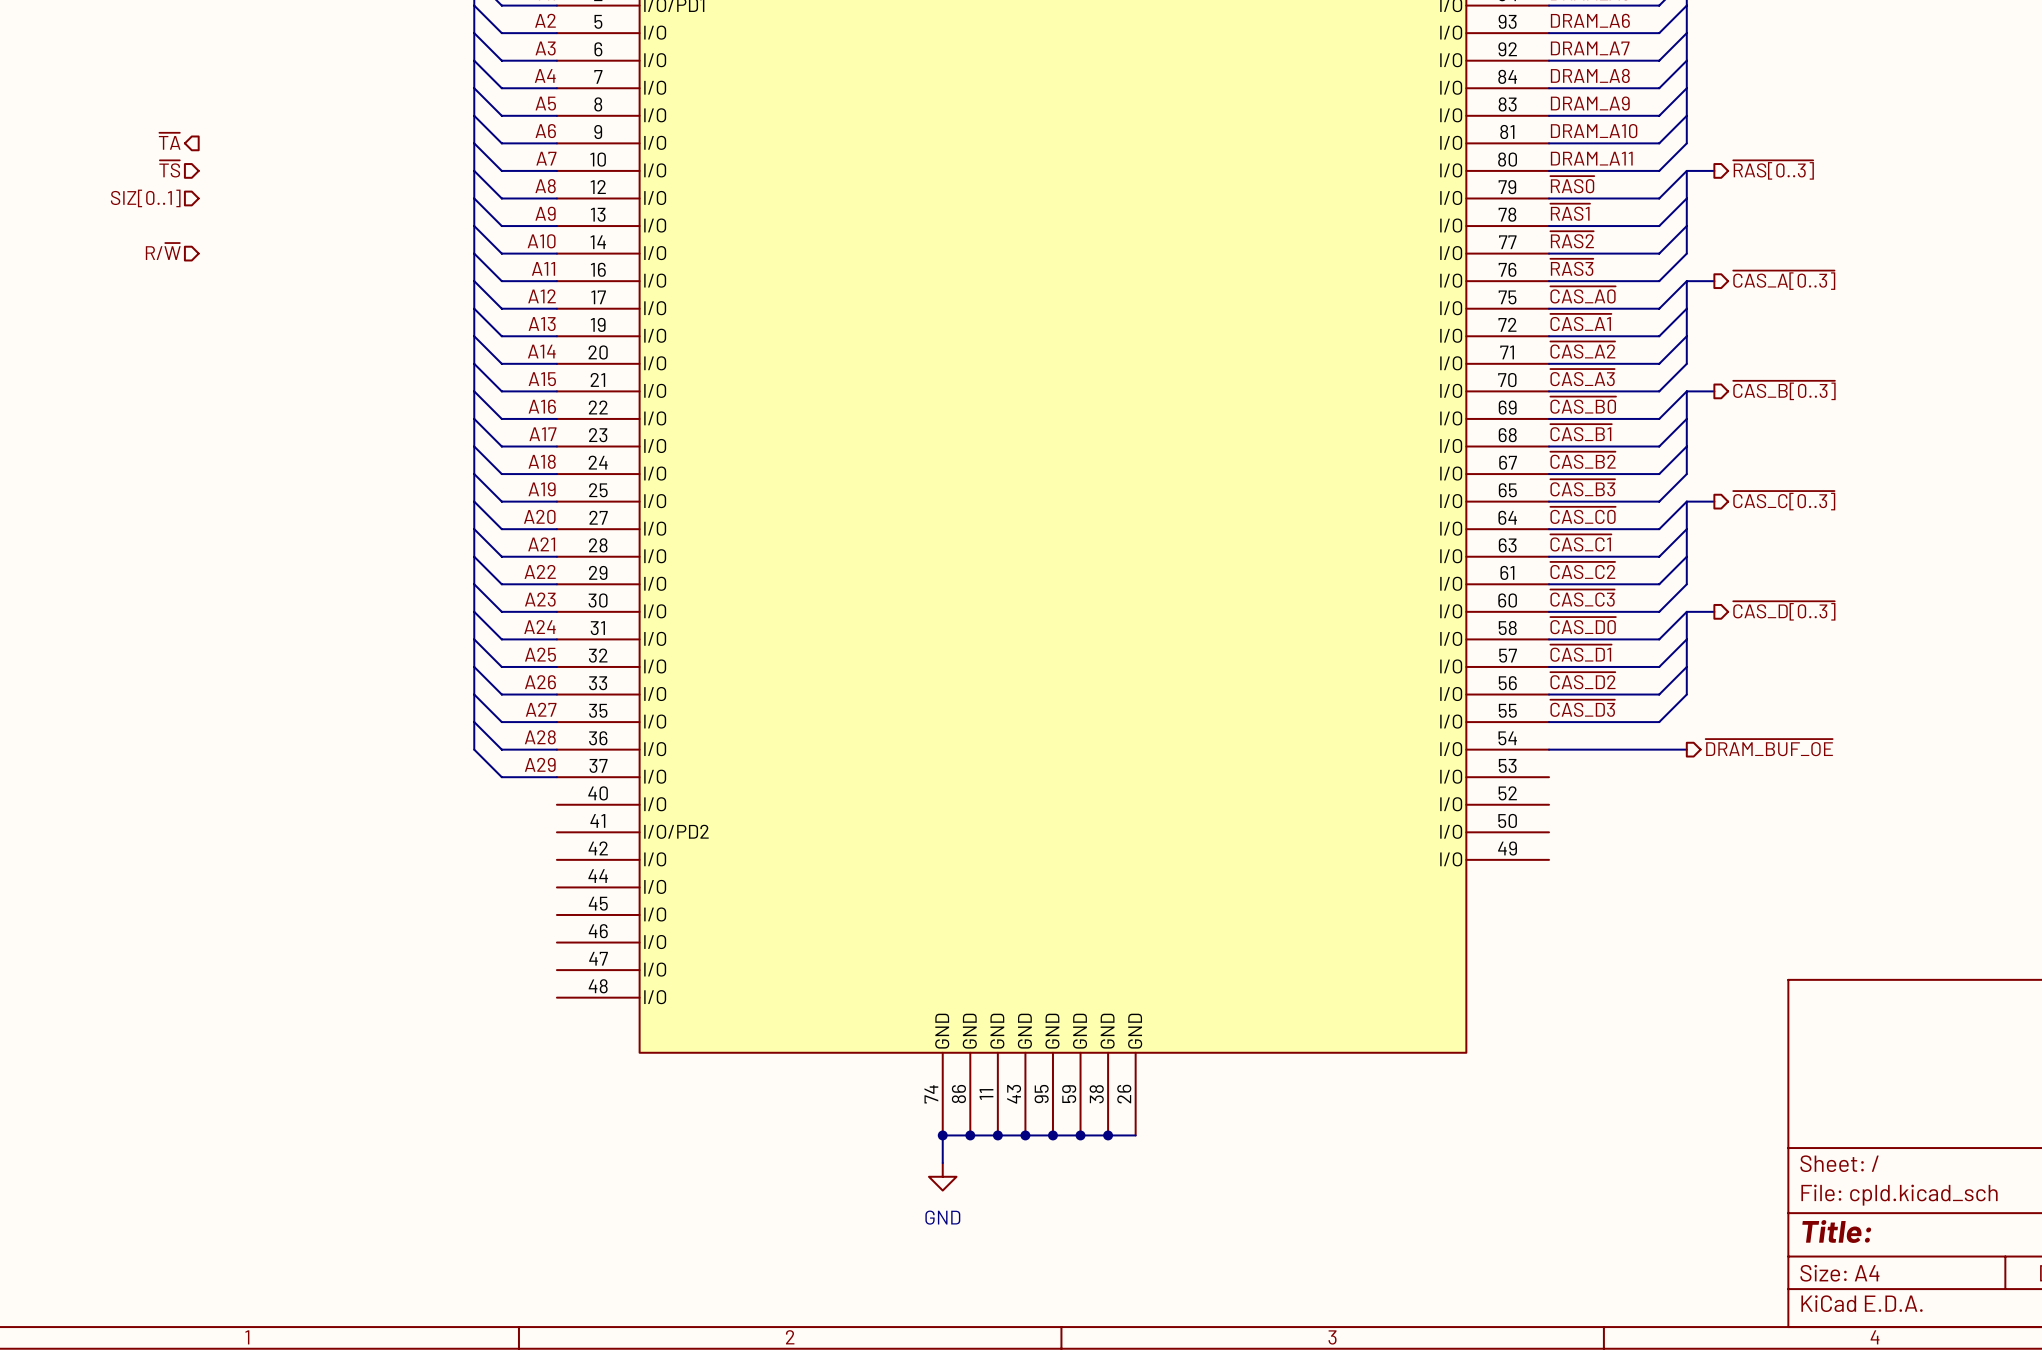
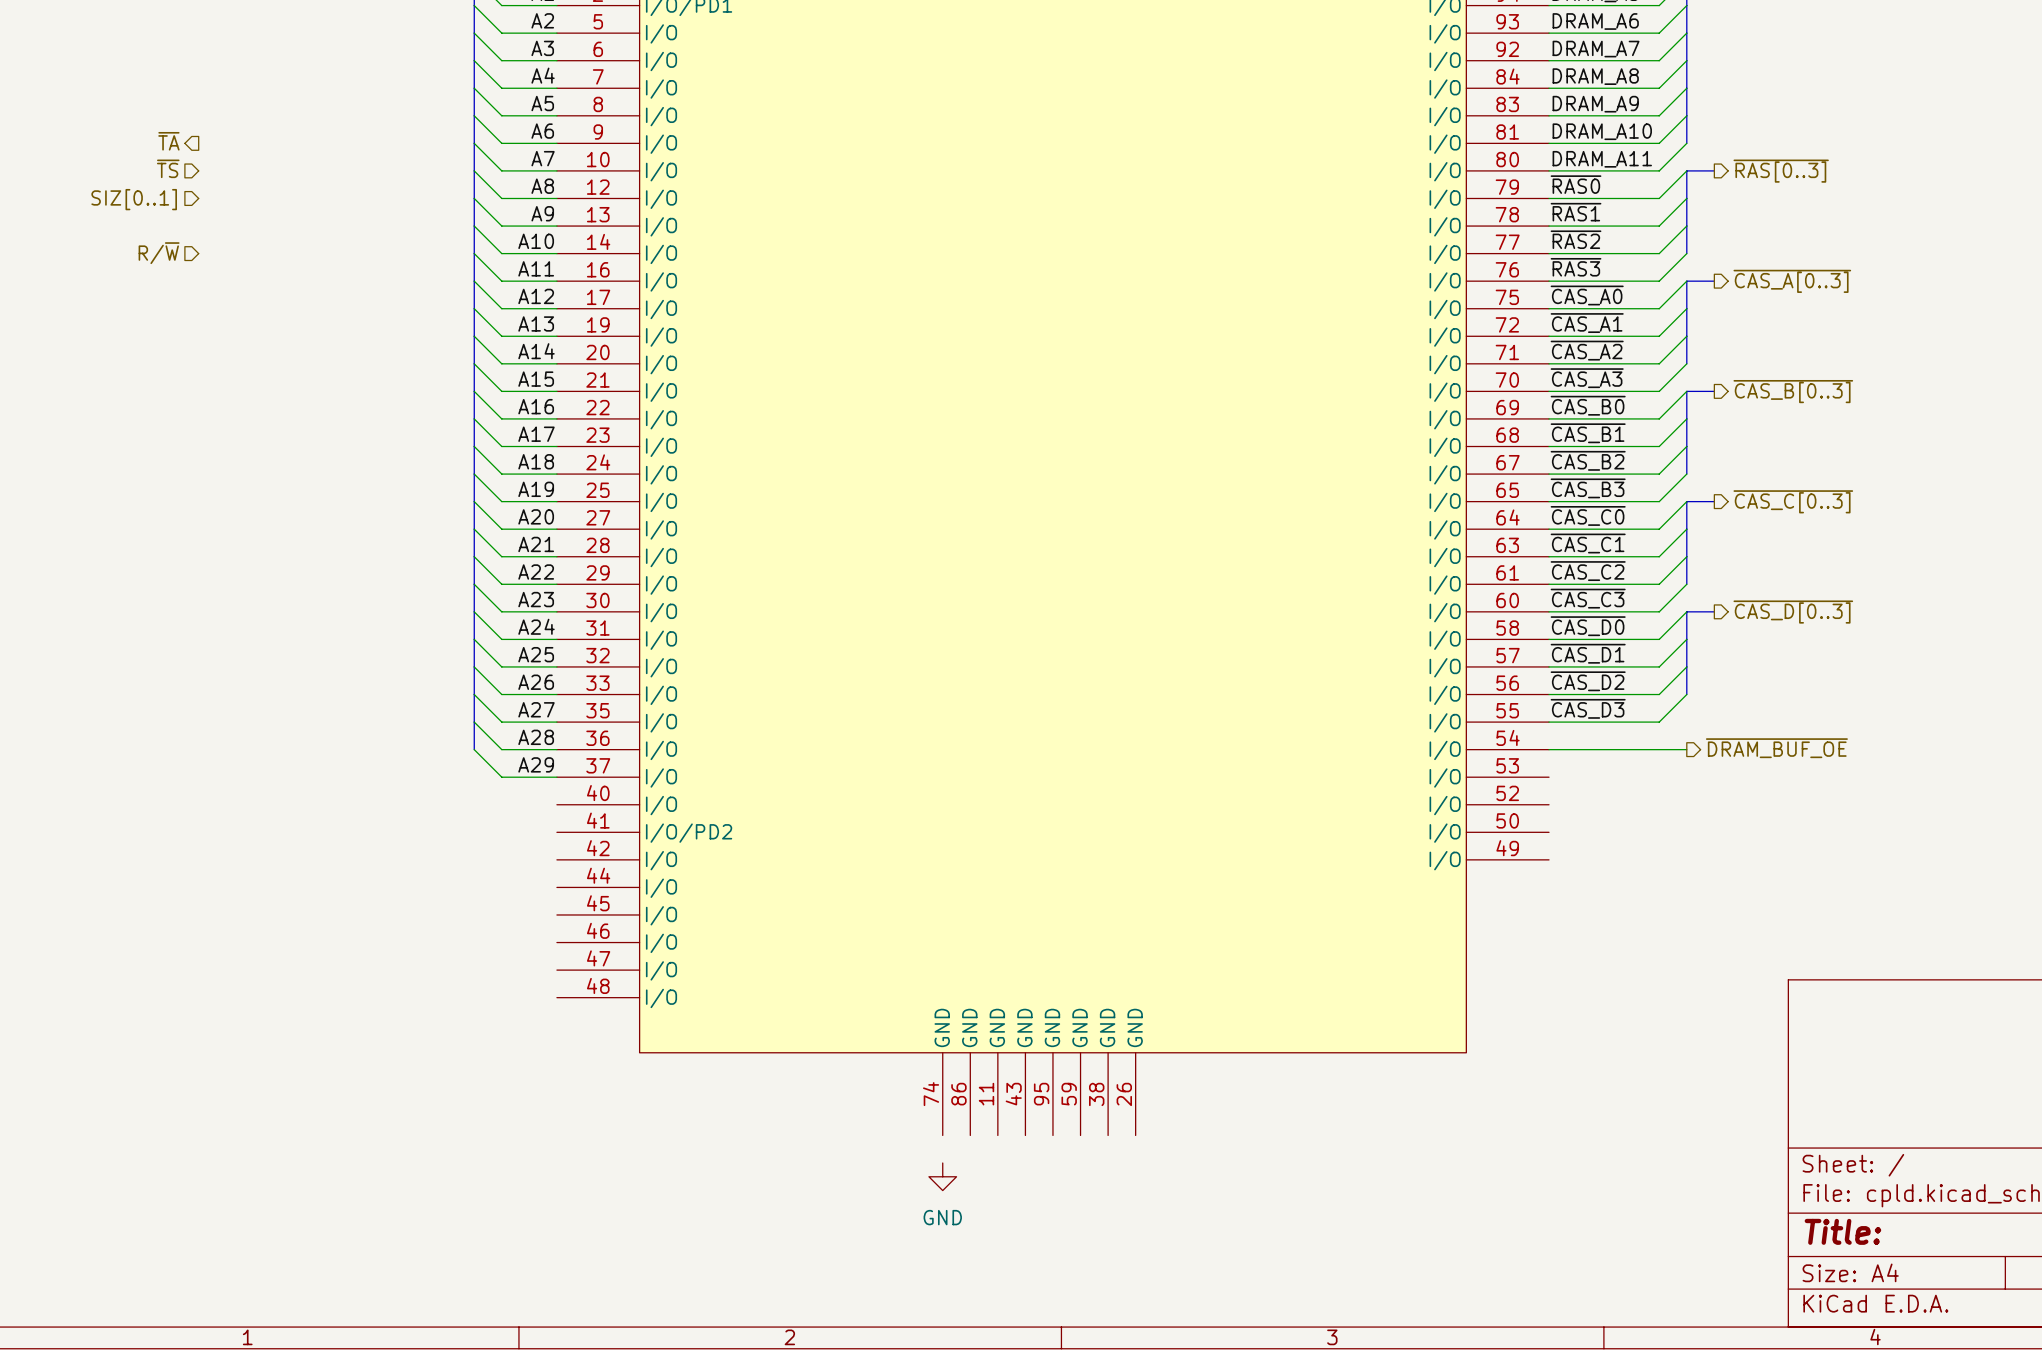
junction: (942, 1135) -> none
junction: (970, 1135) -> none
junction: (997, 1135) -> none
junction: (1025, 1135) -> none
junction: (1052, 1135) -> none
junction: (1080, 1135) -> none
junction: (1108, 1135) -> none
wire: (1135, 1135) (942, 1135) (942, 1163) -> none

